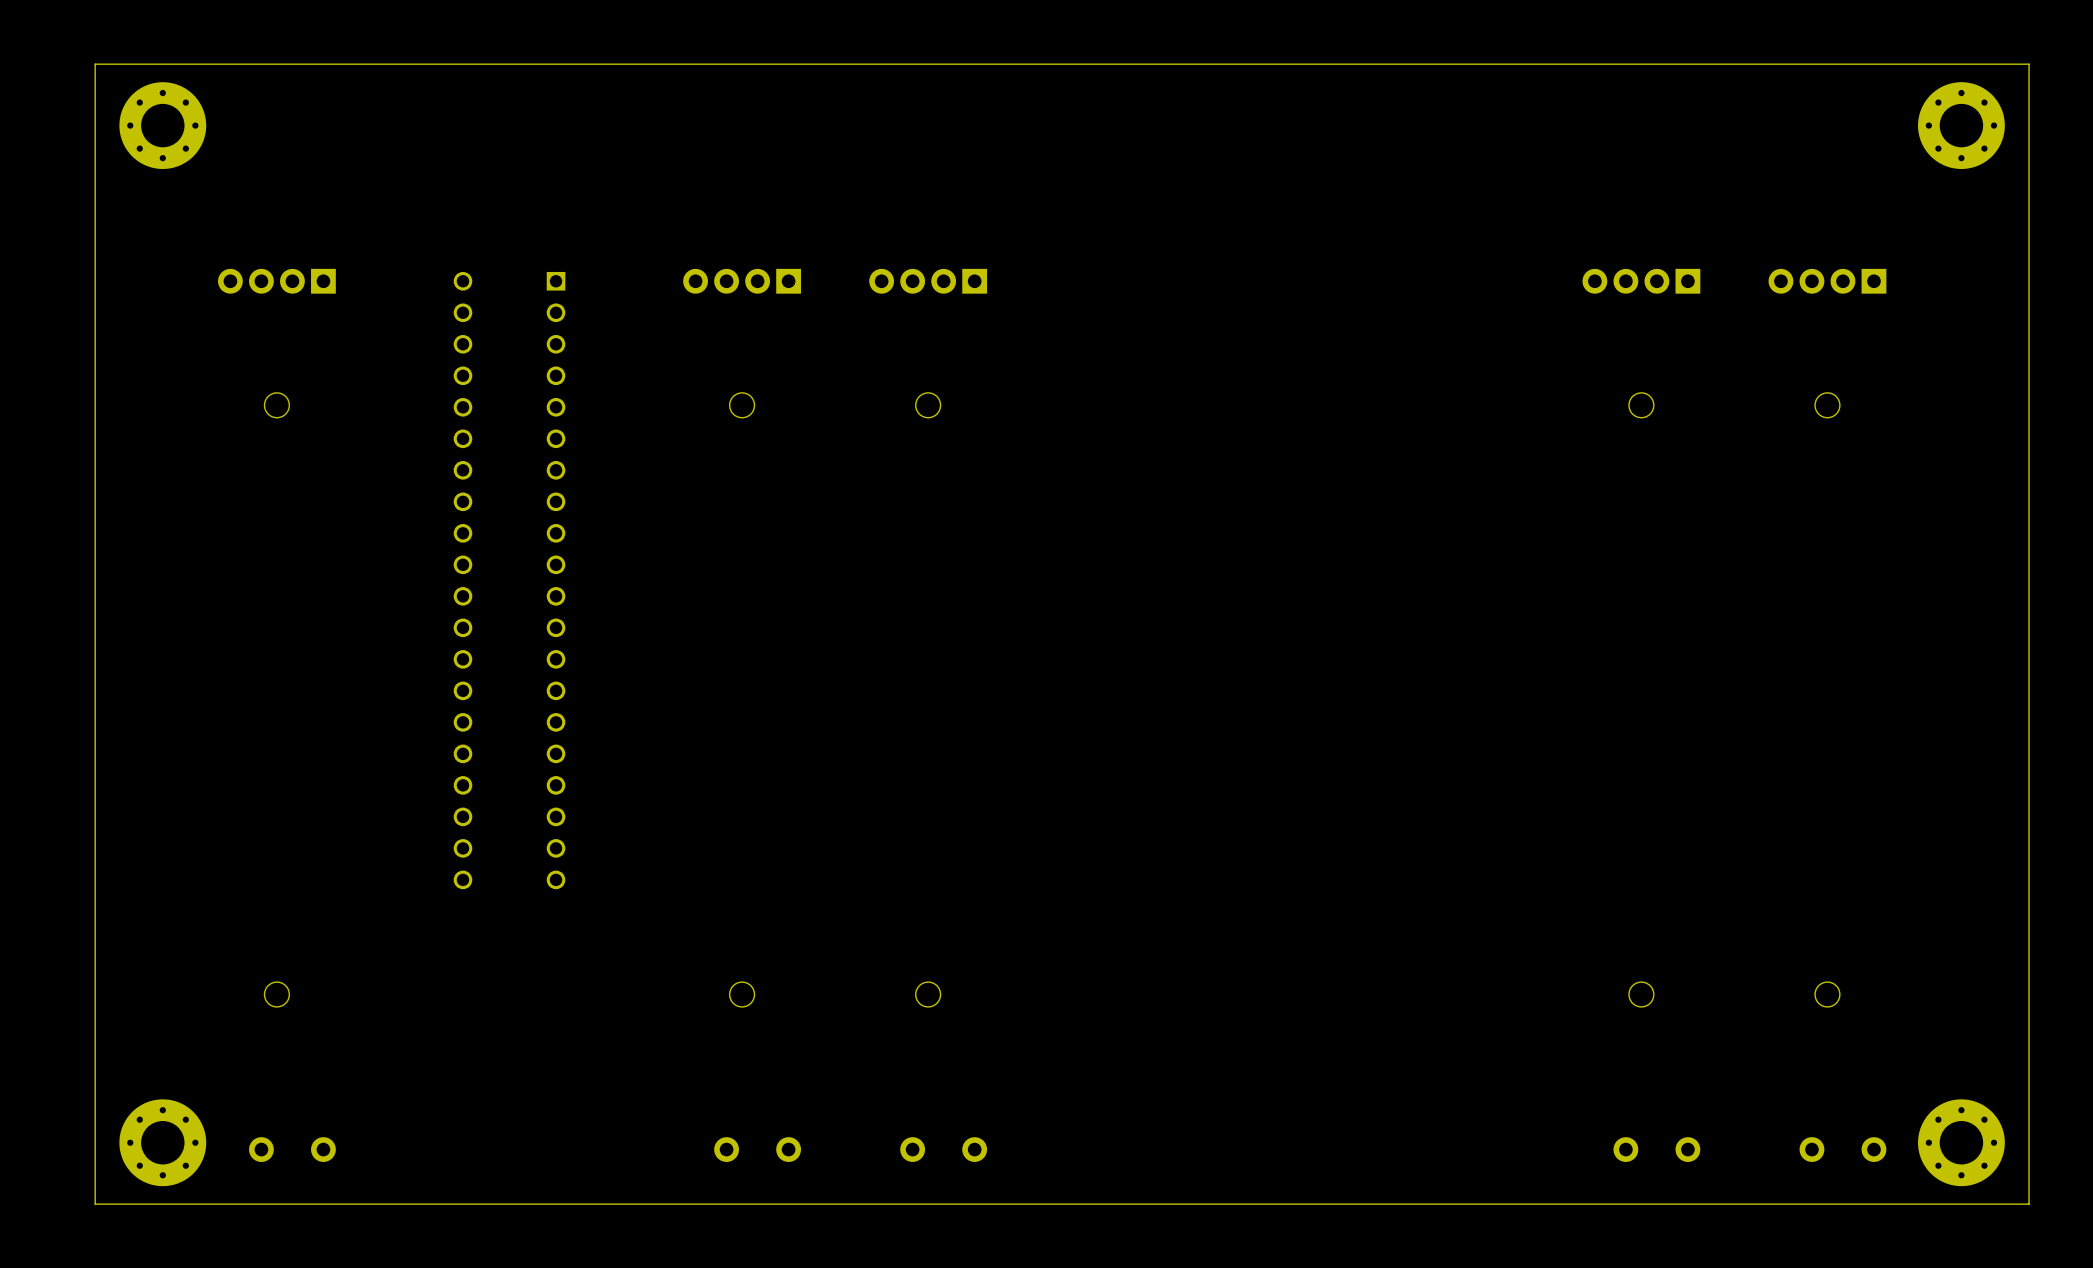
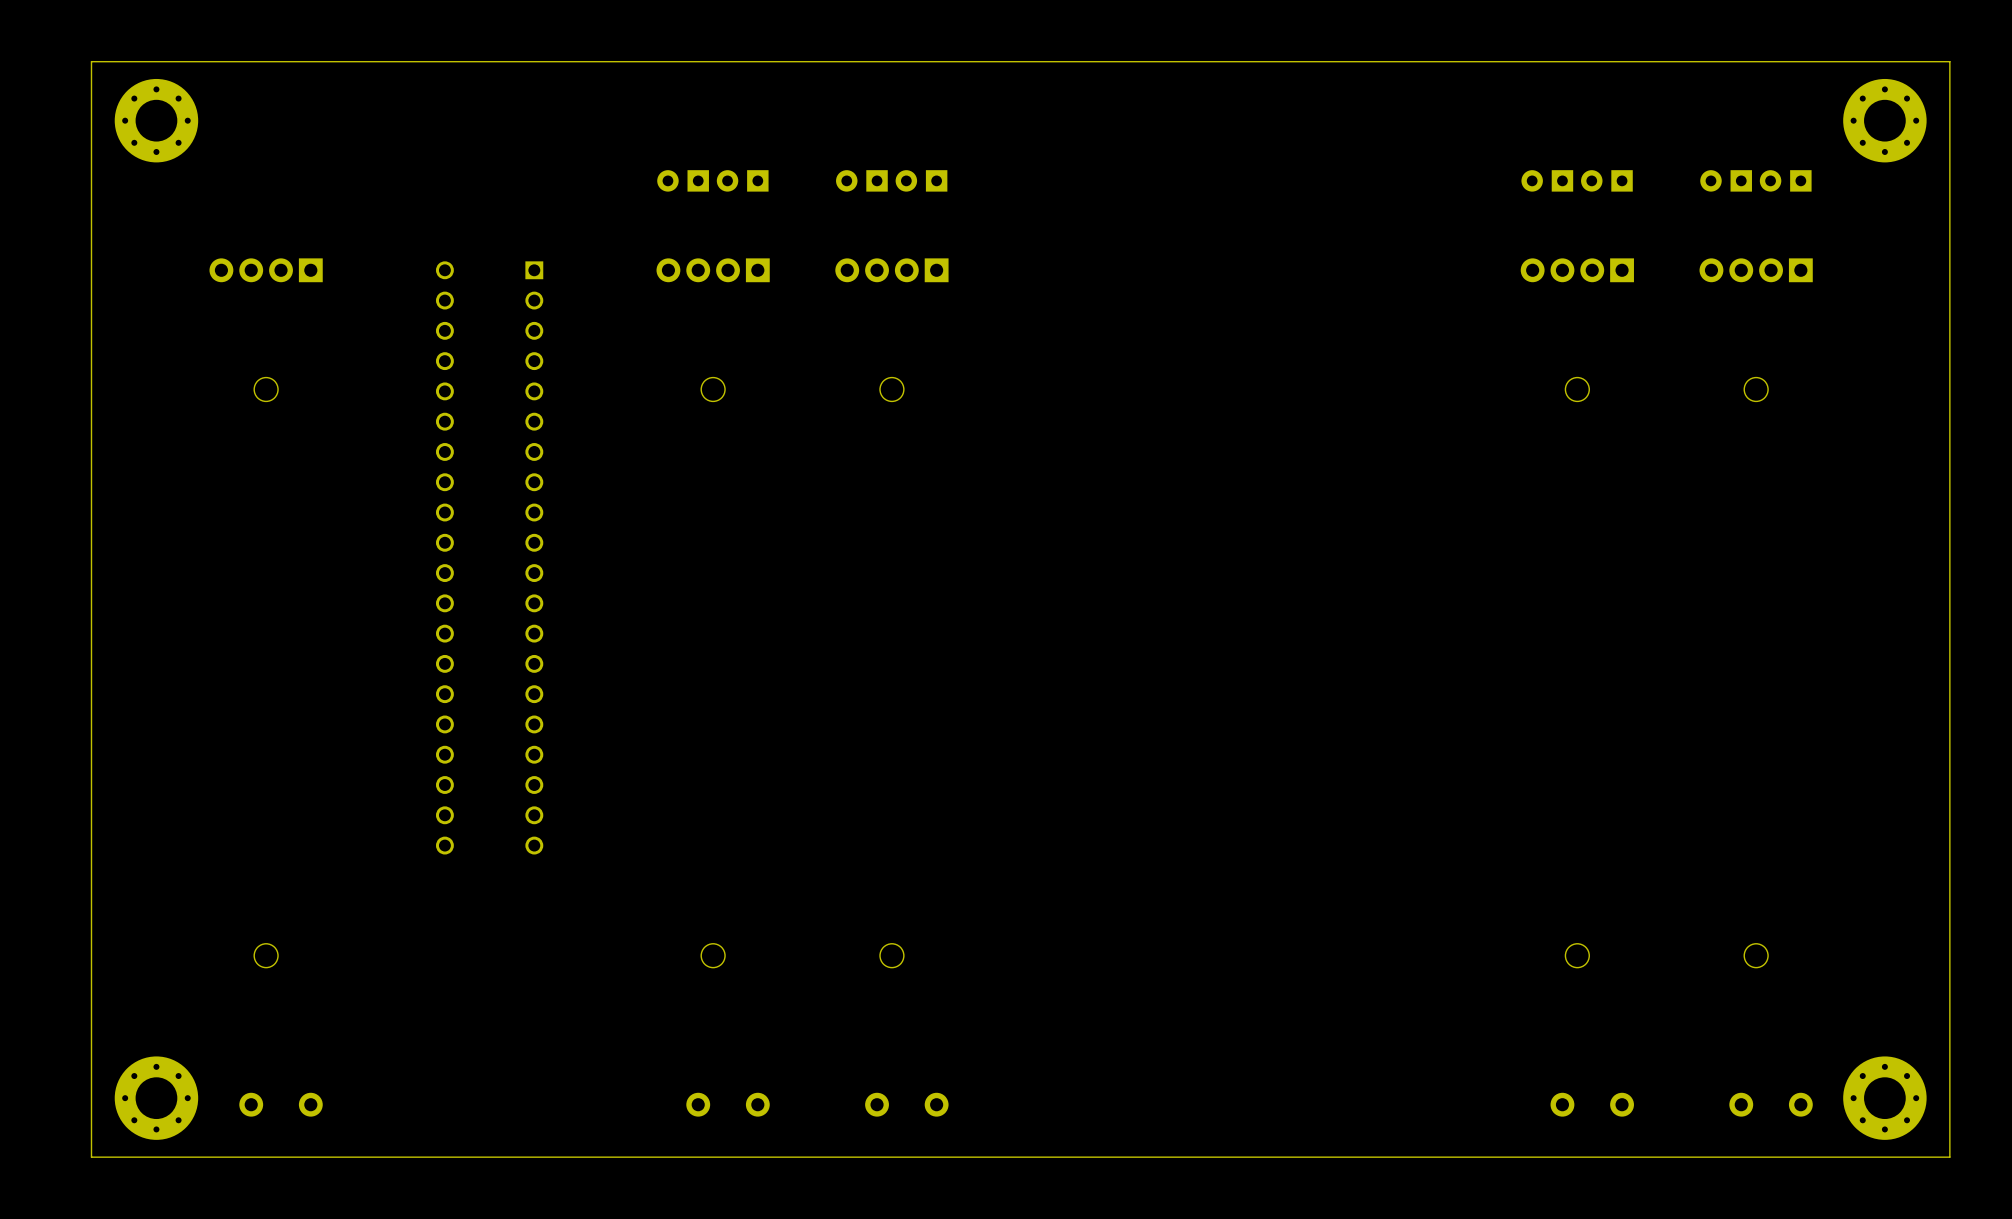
part: none -> (683, 180)
part: none -> (742, 180)
part: none -> (861, 180)
part: none -> (921, 180)
part: none -> (1547, 180)
part: none -> (1606, 180)
part: none -> (1726, 180)
part: none -> (1785, 180)

